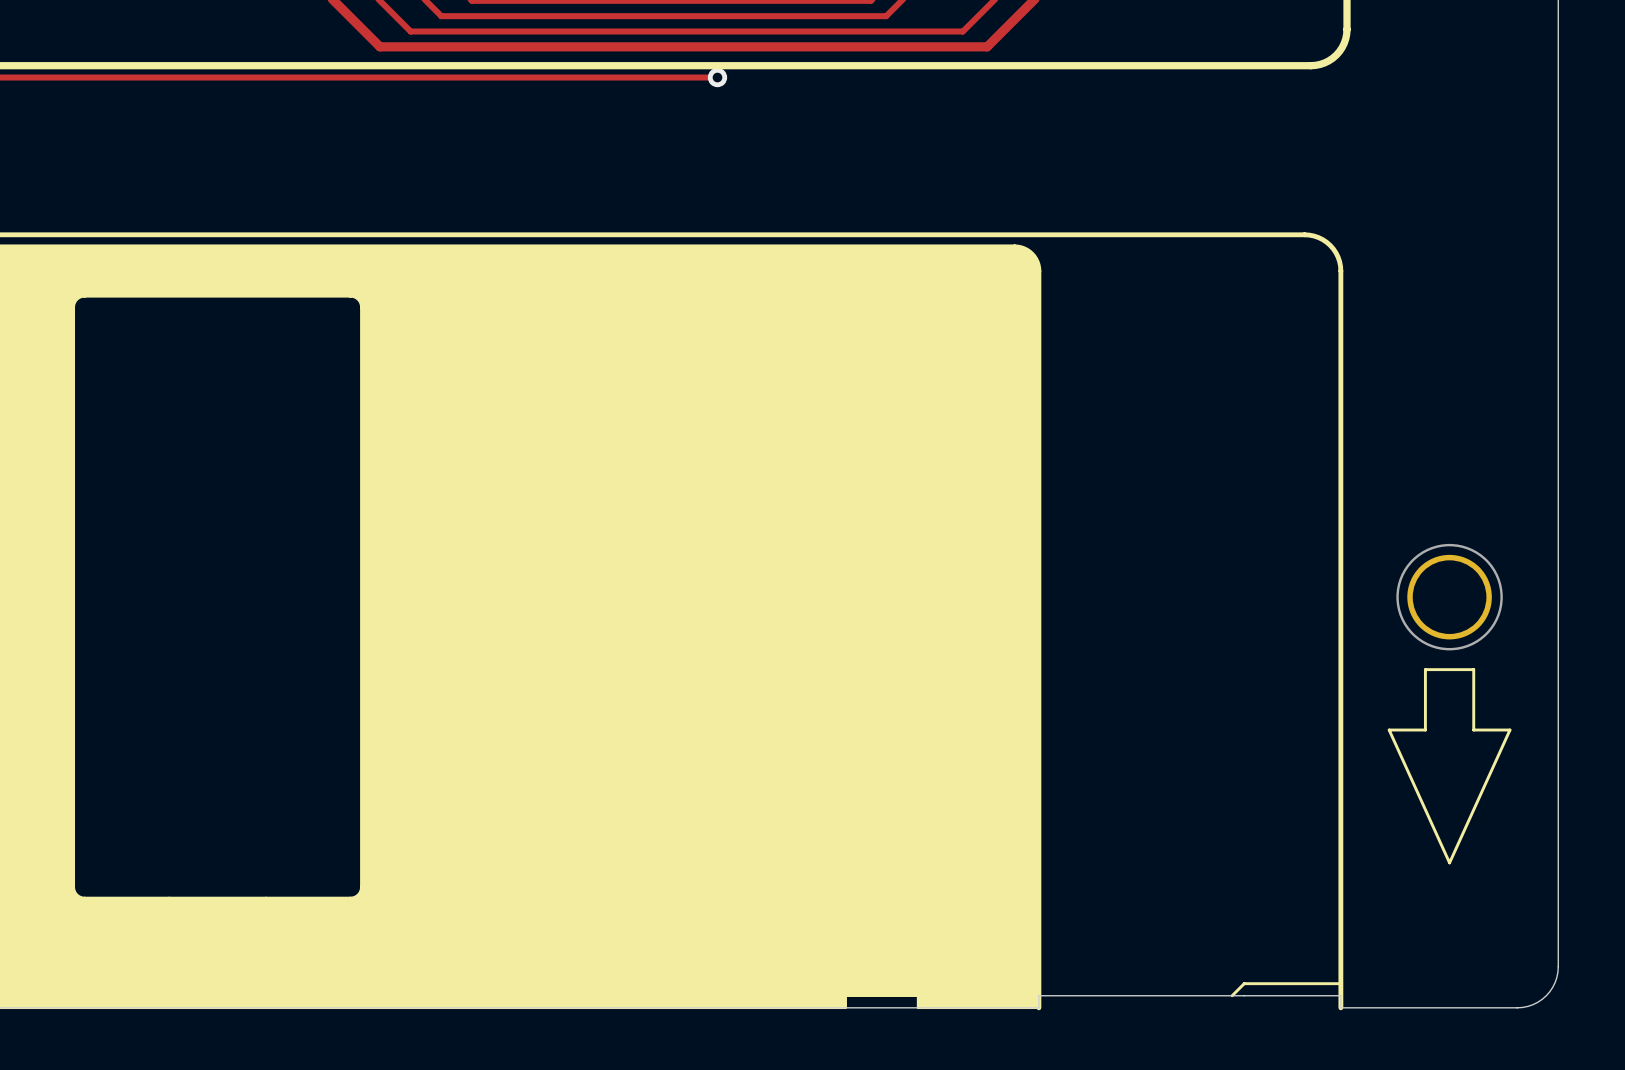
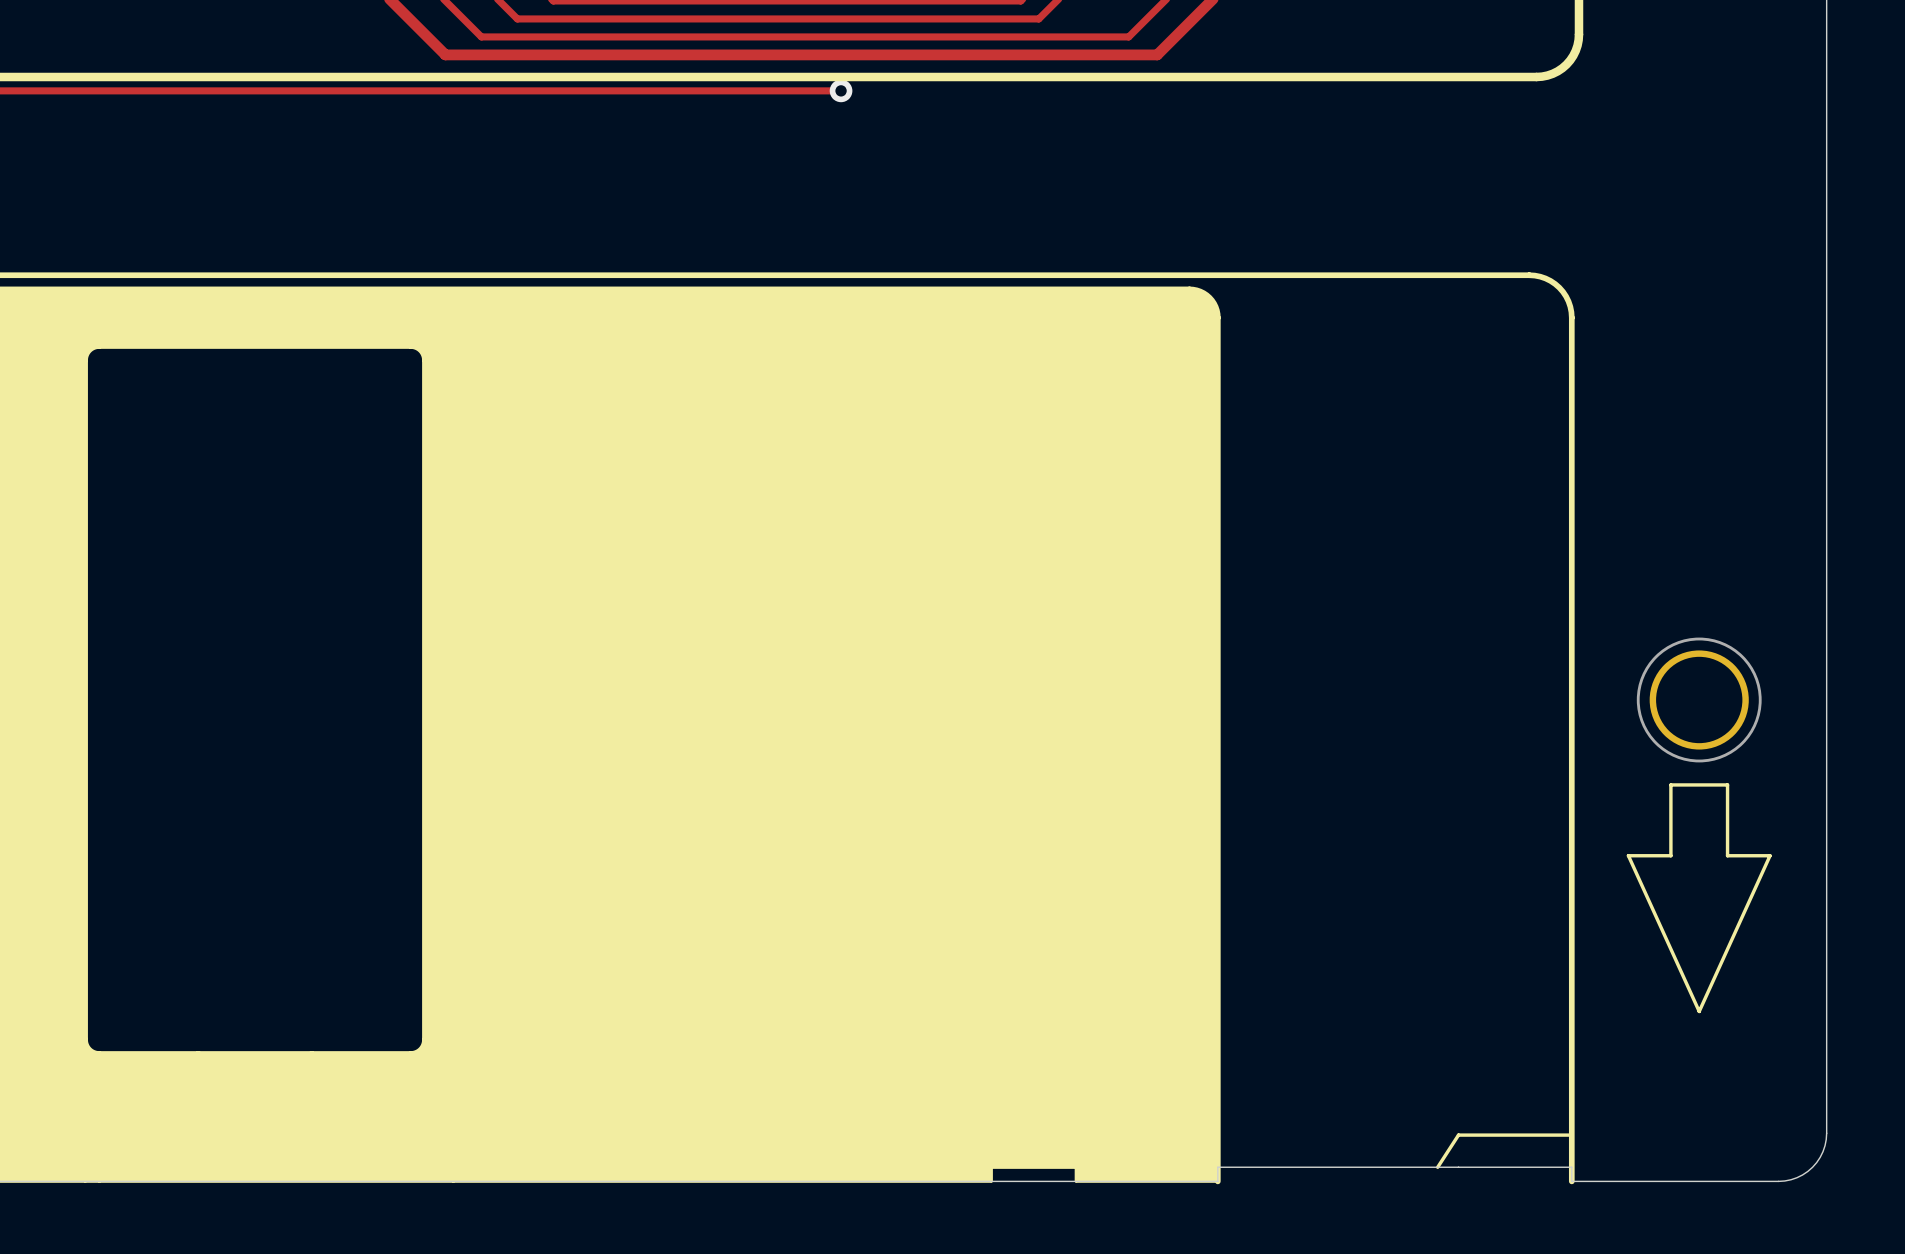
line: none -> (1571, 1135) (1458, 1135) (1437, 1167)
line: (1340, 983) (1244, 983) (1232, 995) -> none

